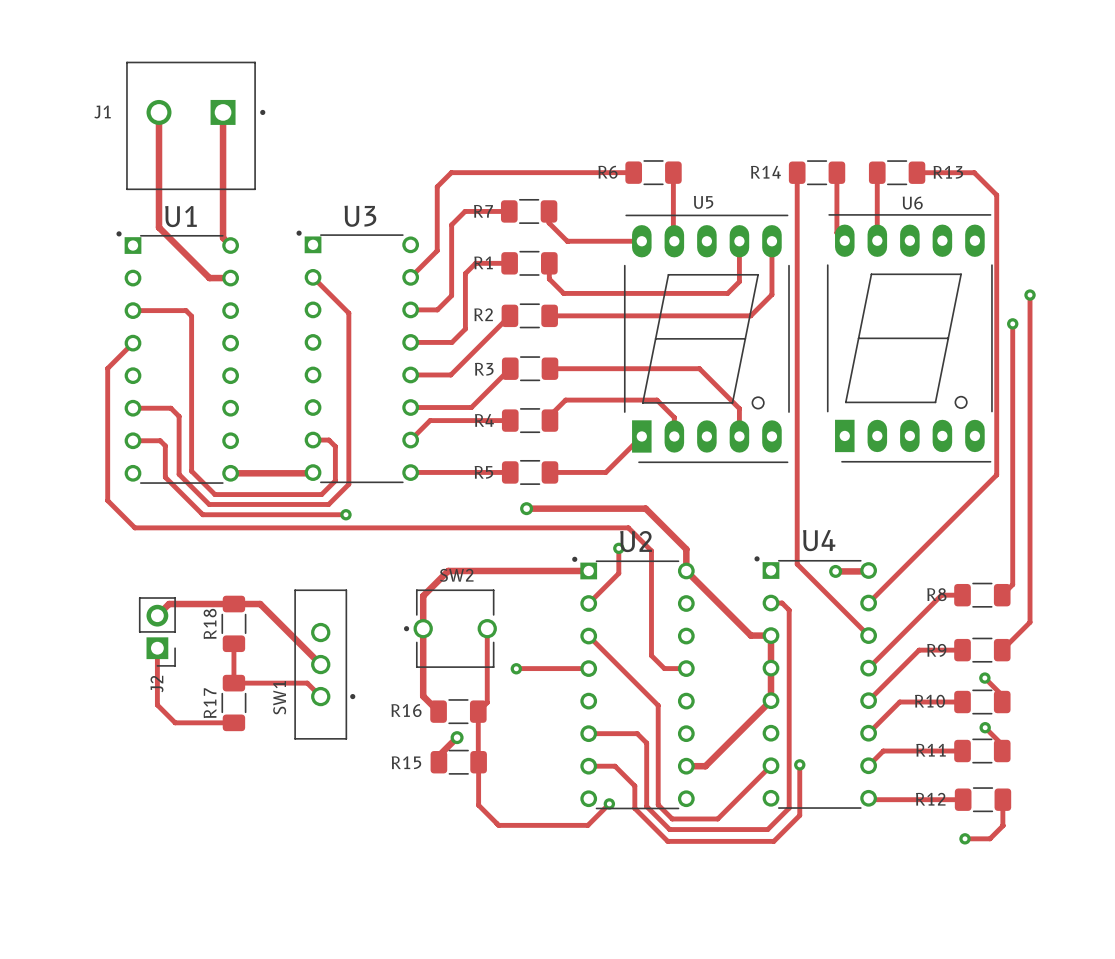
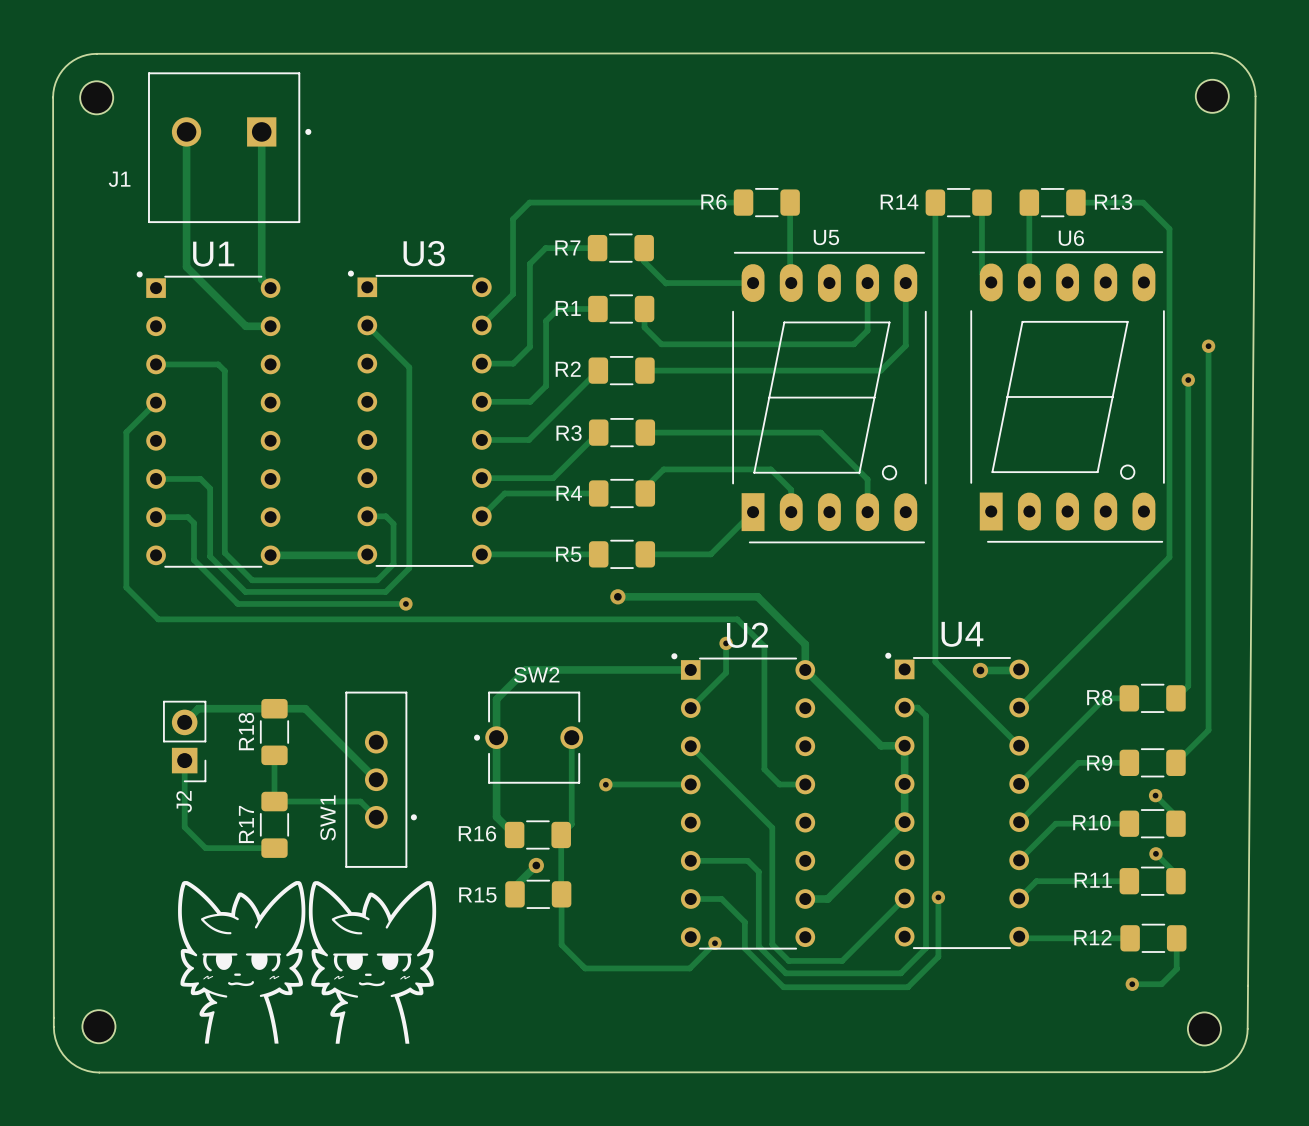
board edge: none -> (1212, 53) (96, 53) (82, 56) (69, 63) (57, 78) (53, 97) (53, 1027) (55, 1038) (63, 1054) (76, 1066) (87, 1070) (99, 1072) (1204, 1072) (1218, 1069) (1231, 1062) (1243, 1047) (1247, 1028) (1255, 96) (1253, 82) (1242, 65) (1226, 55) (1212, 53)
part: none -> (1212, 96)
part: none -> (96, 97)
J1 name position: J1 (102, 112) -> J1 (119, 179)
drawing: none -> [178, 881, 437, 1044]
part: none -> (98, 1026)
part: none -> (1204, 1028)

